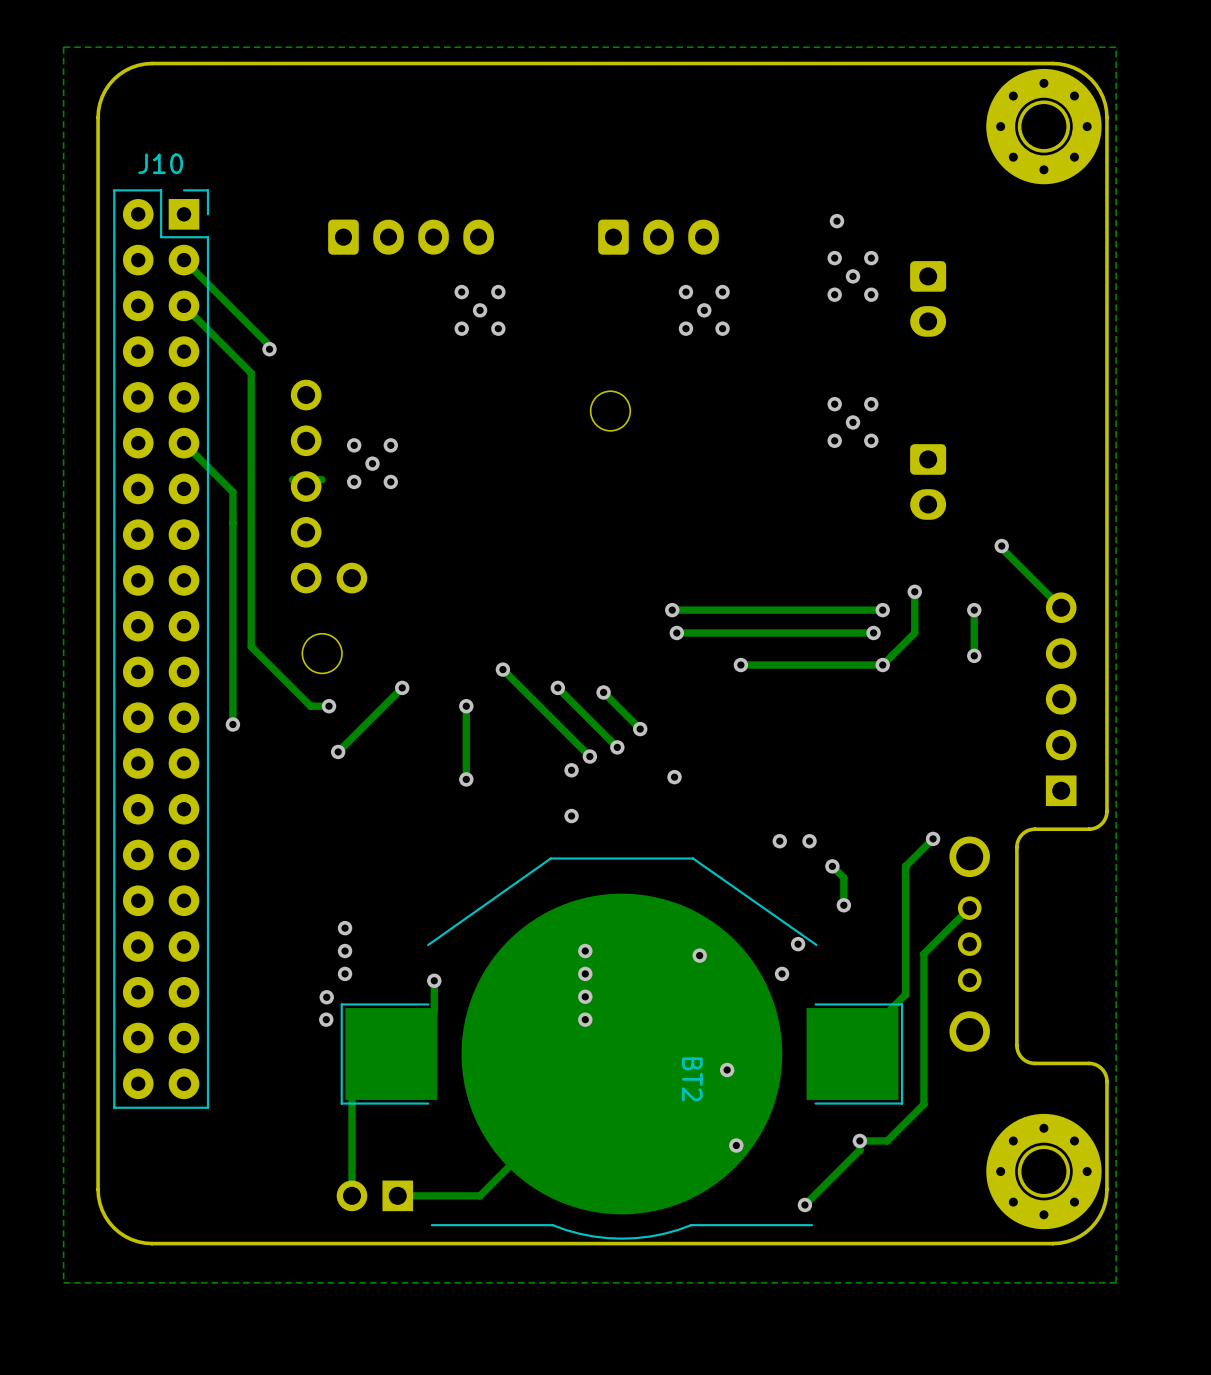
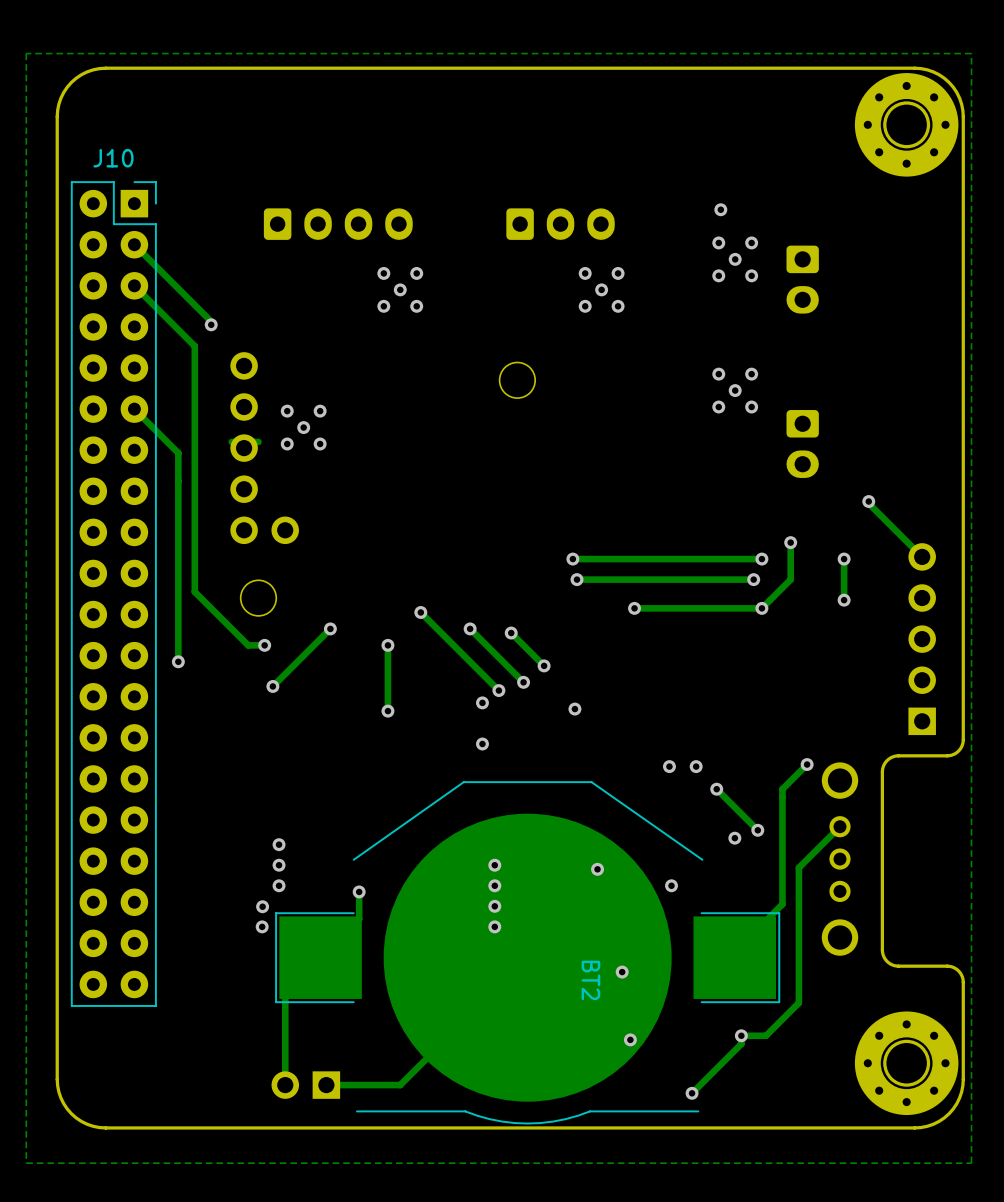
track: (843, 877) (843, 905) -> (726, 799) (757, 830)
via: (843, 905) -> none
via: none -> (757, 830)
via: none -> (734, 838)
via: (798, 944) -> none

